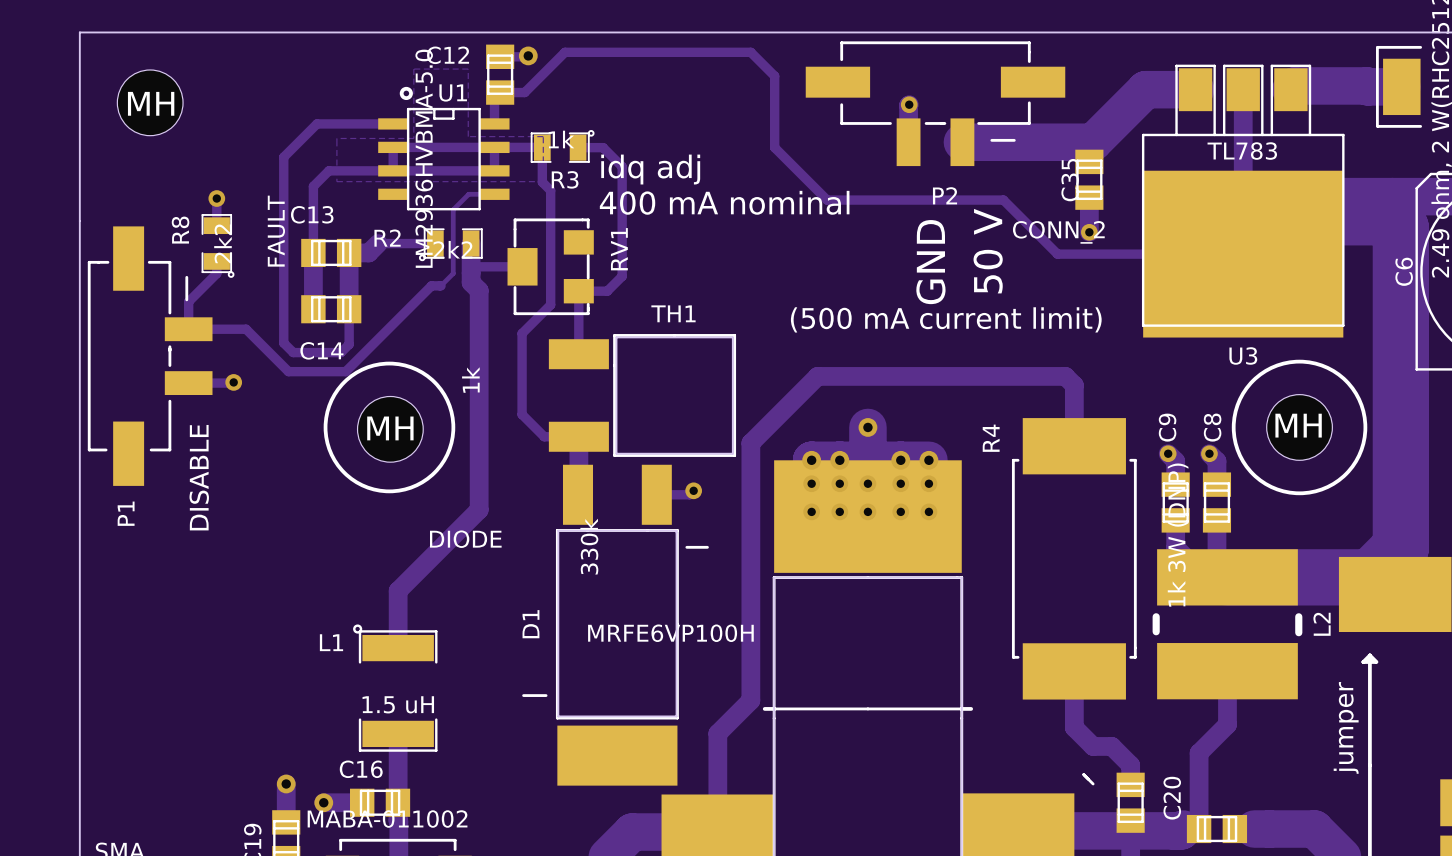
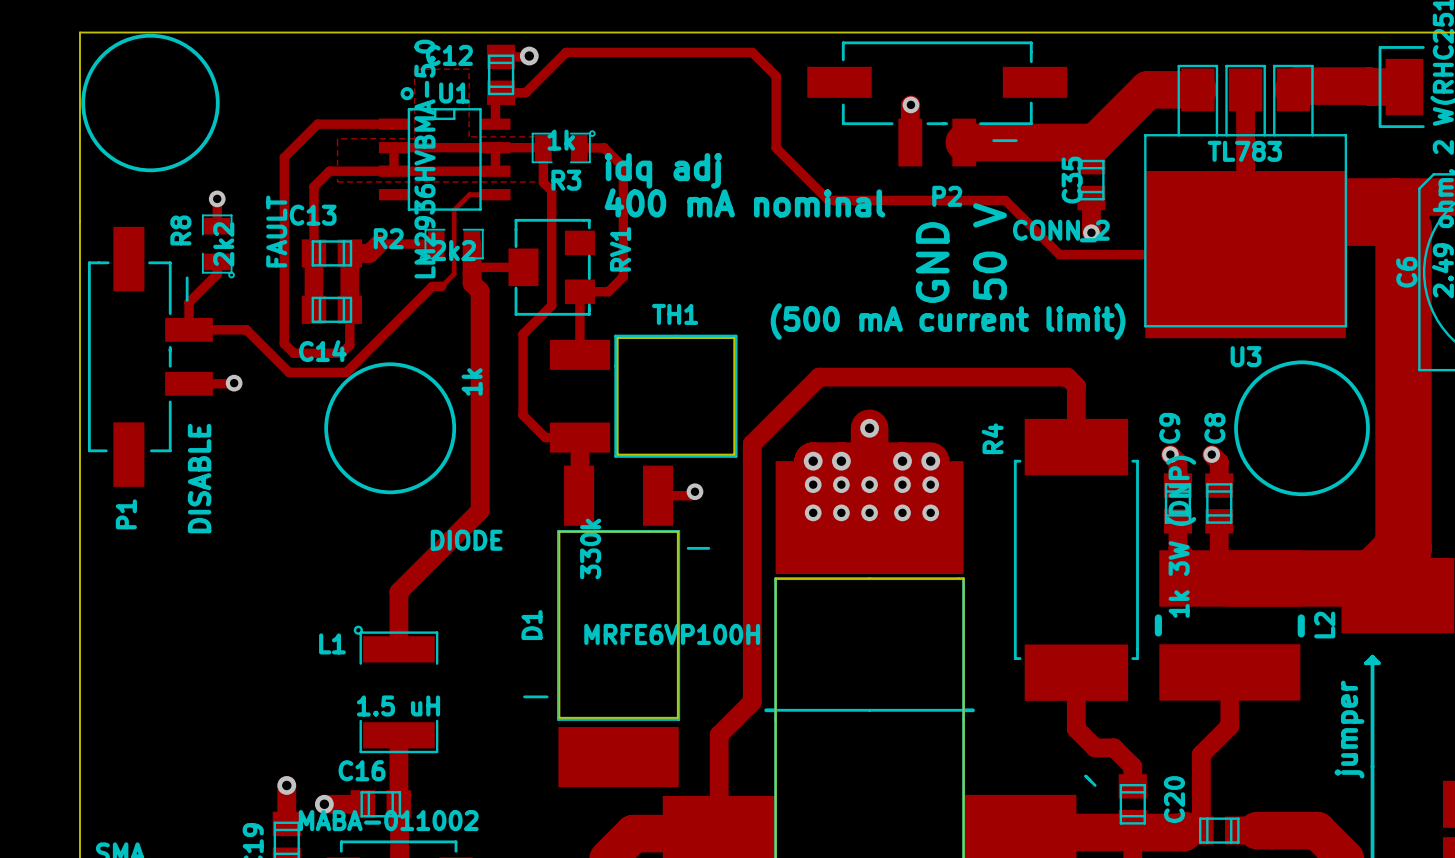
drawing: none -> [81, 33, 220, 173]
MH: (150, 102) -> none
MH: (1299, 427) -> none
MH: (390, 429) -> none

